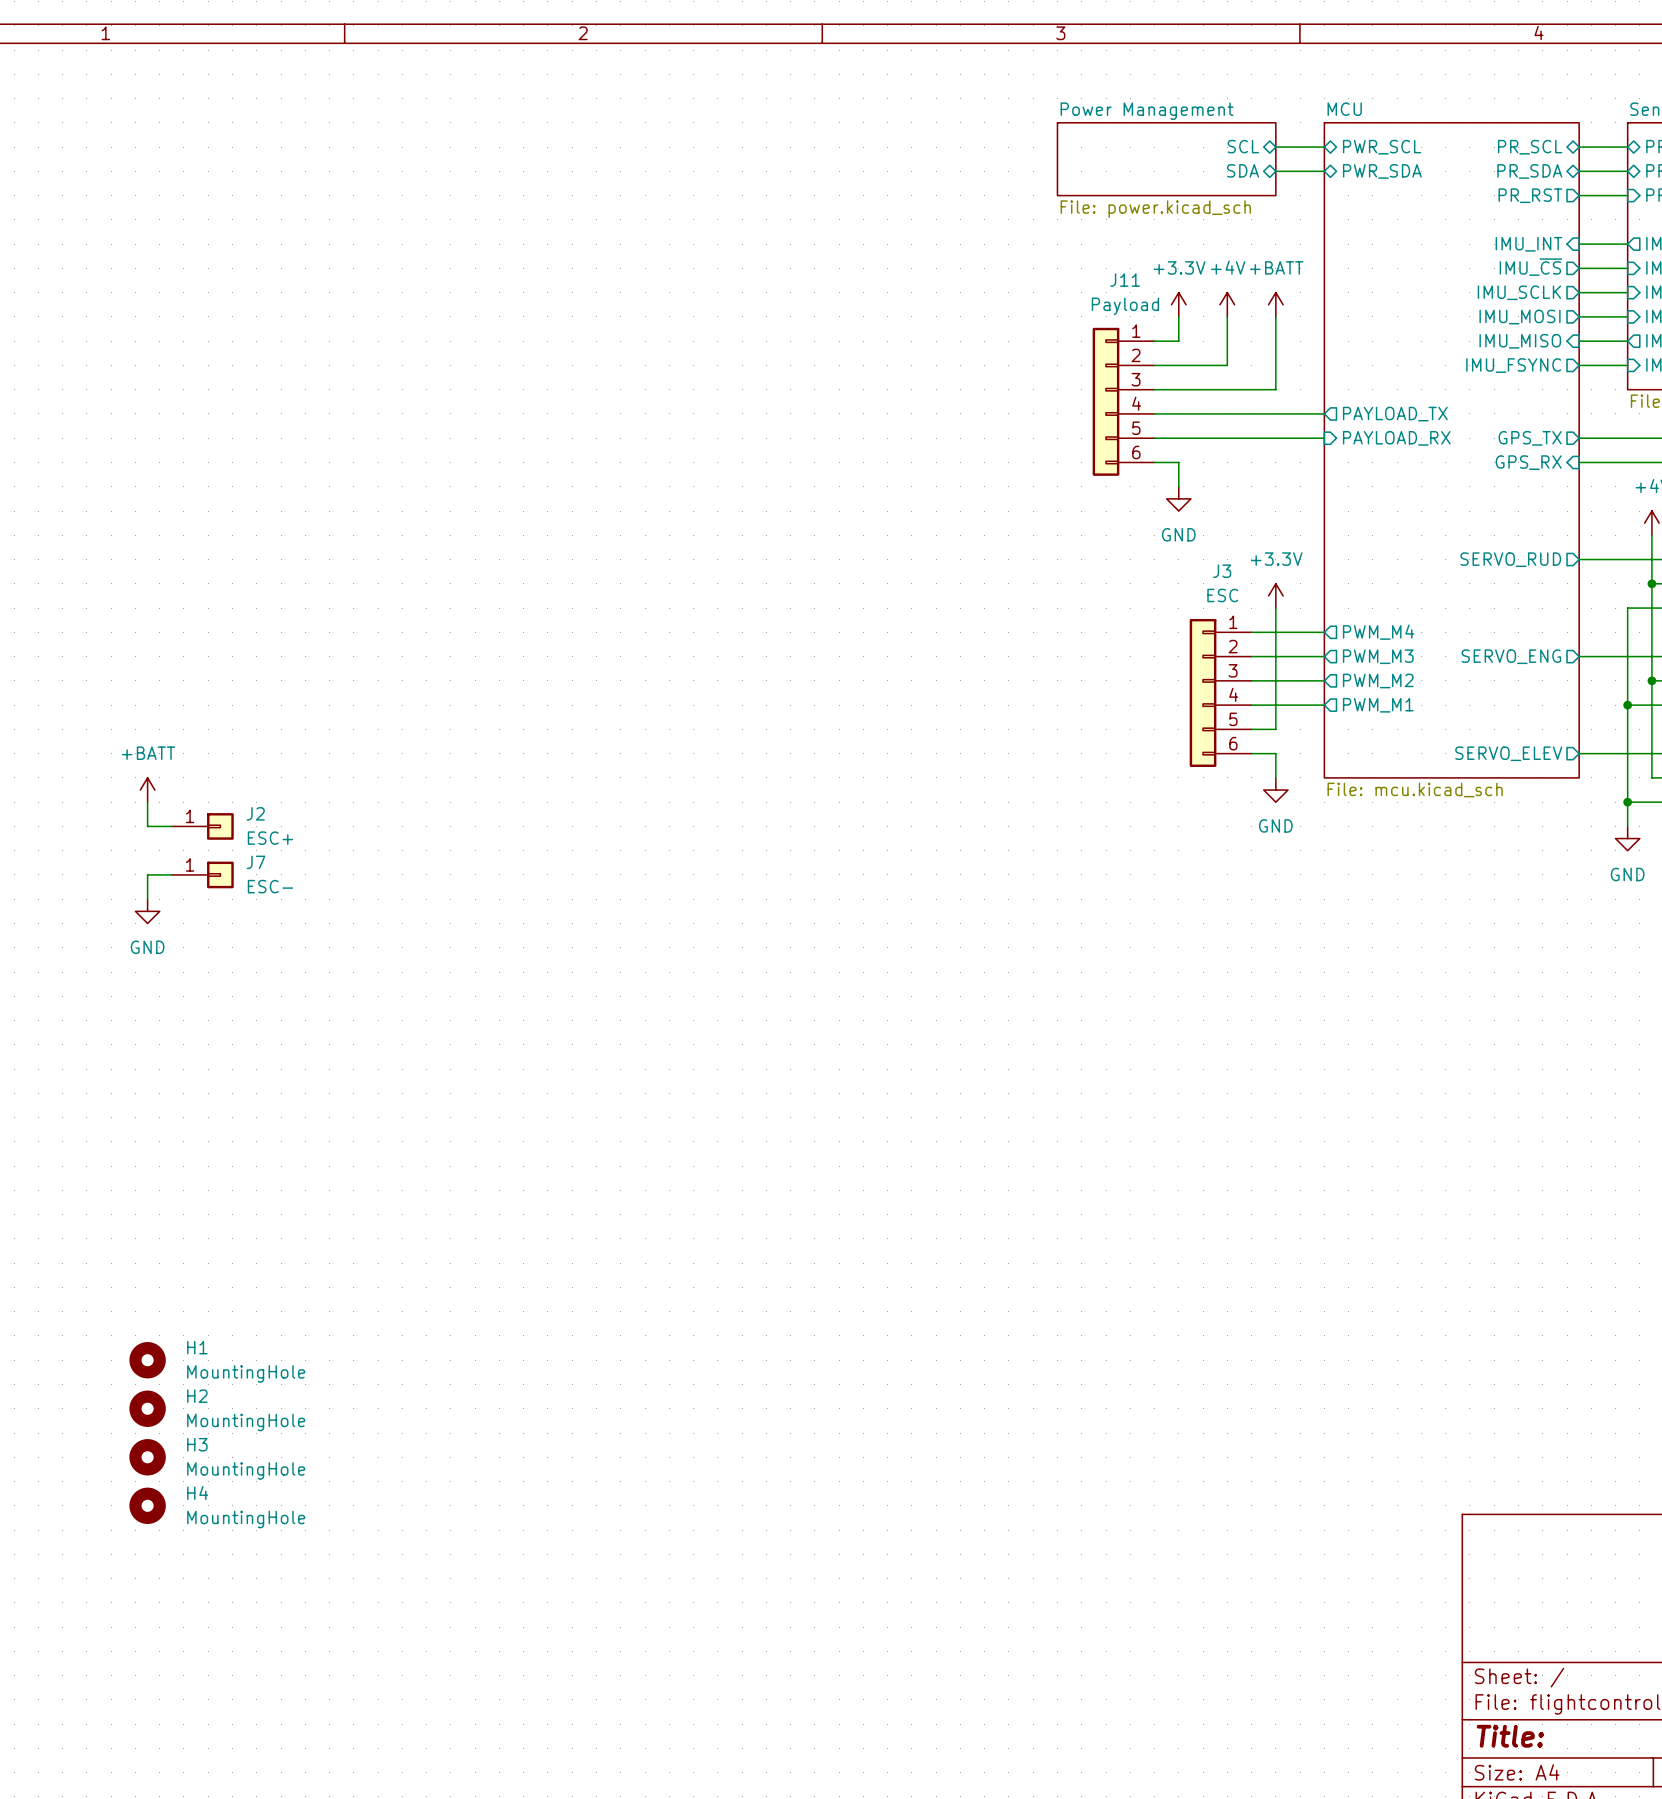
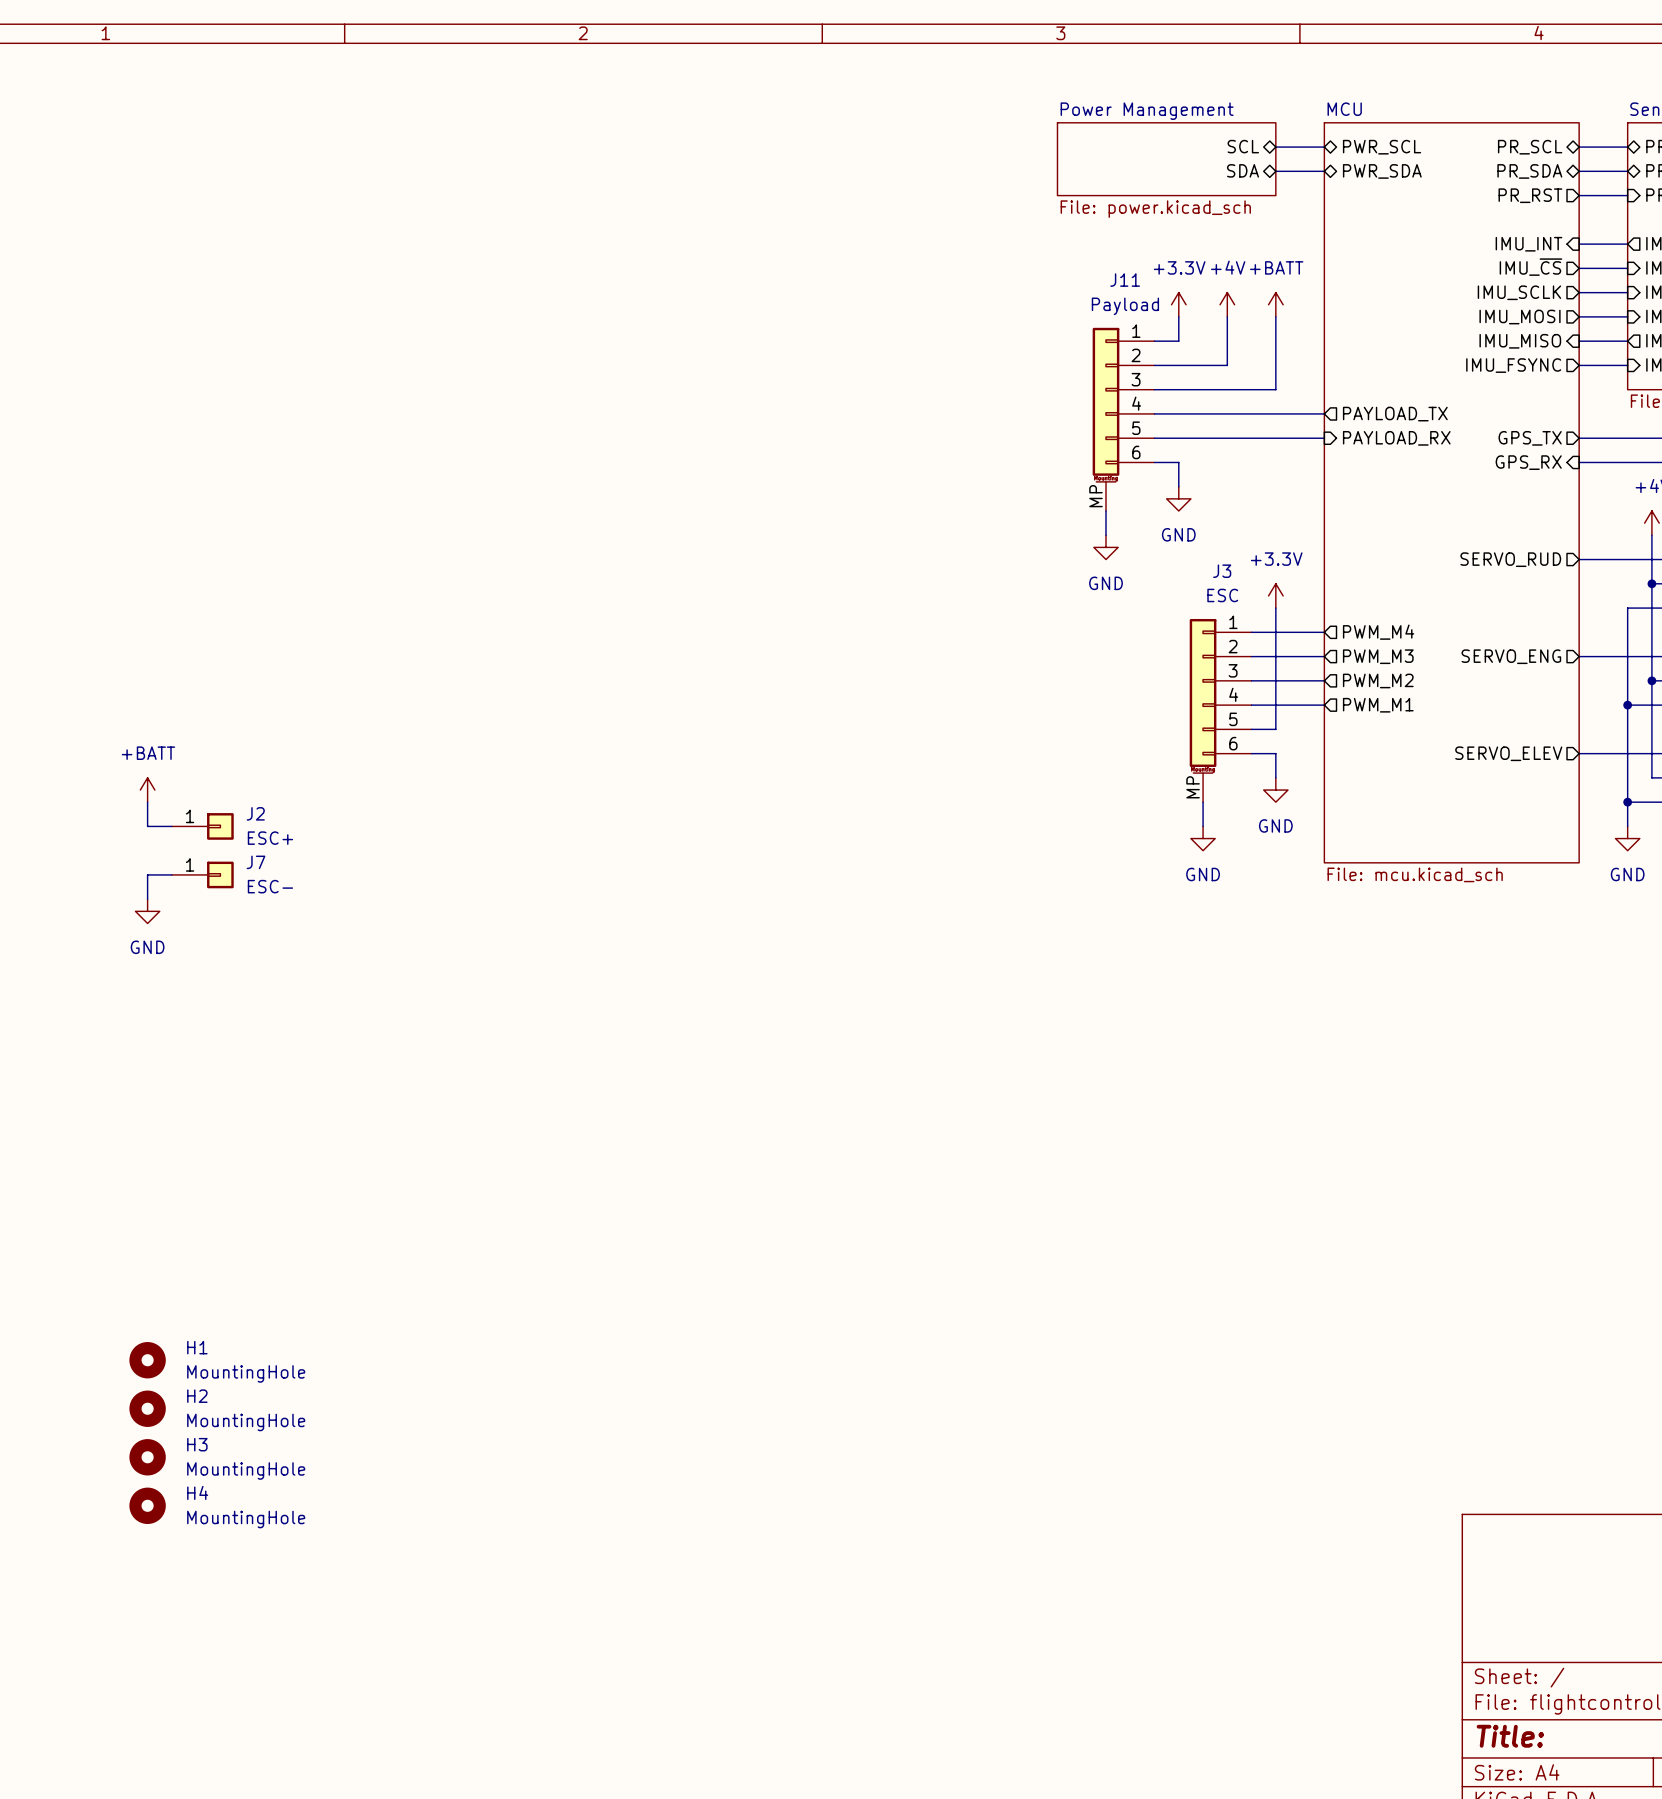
J11 symbol: [1092, 327, 1155, 476] -> [1092, 327, 1155, 512]
sheet MCU: File: mcu.kicad_sch (1451, 450) -> none
sheet MCU: none -> File: mcu.kicad_sch (1451, 492)
wire: none -> (1106, 511) (1106, 535)
power symbol: none -> GND (1106, 547)
J3 symbol: [1189, 618, 1252, 767] -> [1189, 618, 1252, 803]
wire: none -> (1203, 802) (1203, 826)
power symbol: none -> GND (1203, 838)

